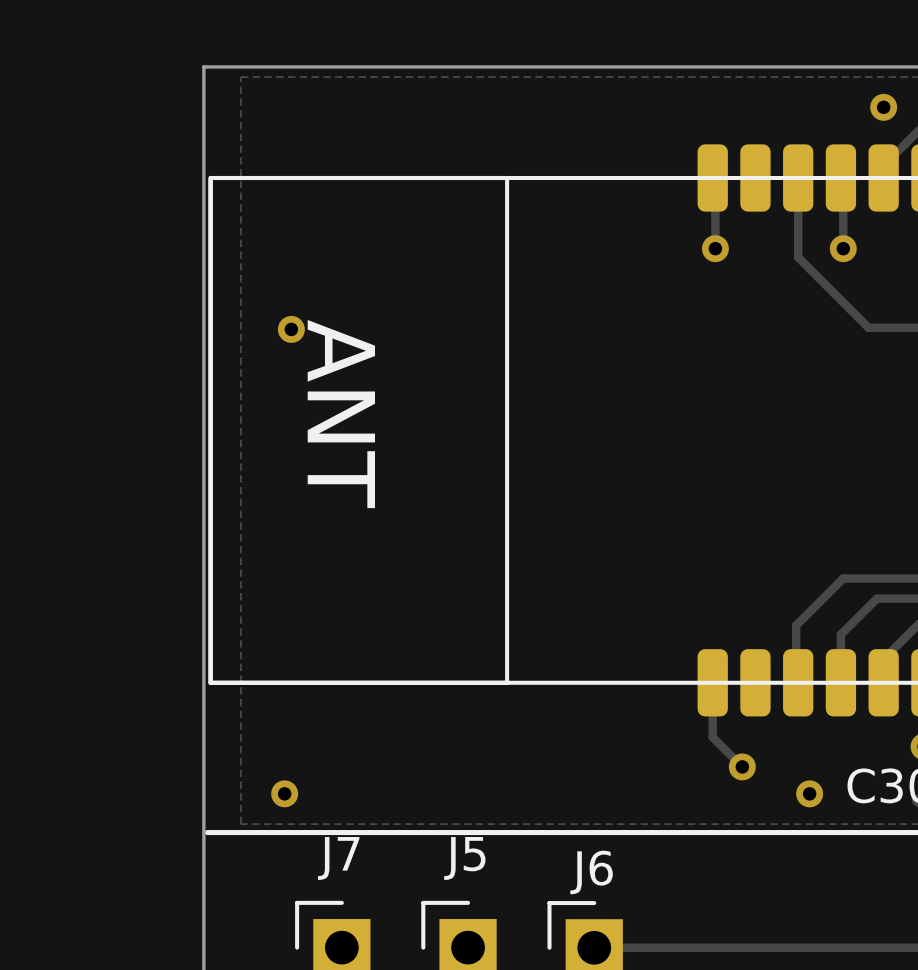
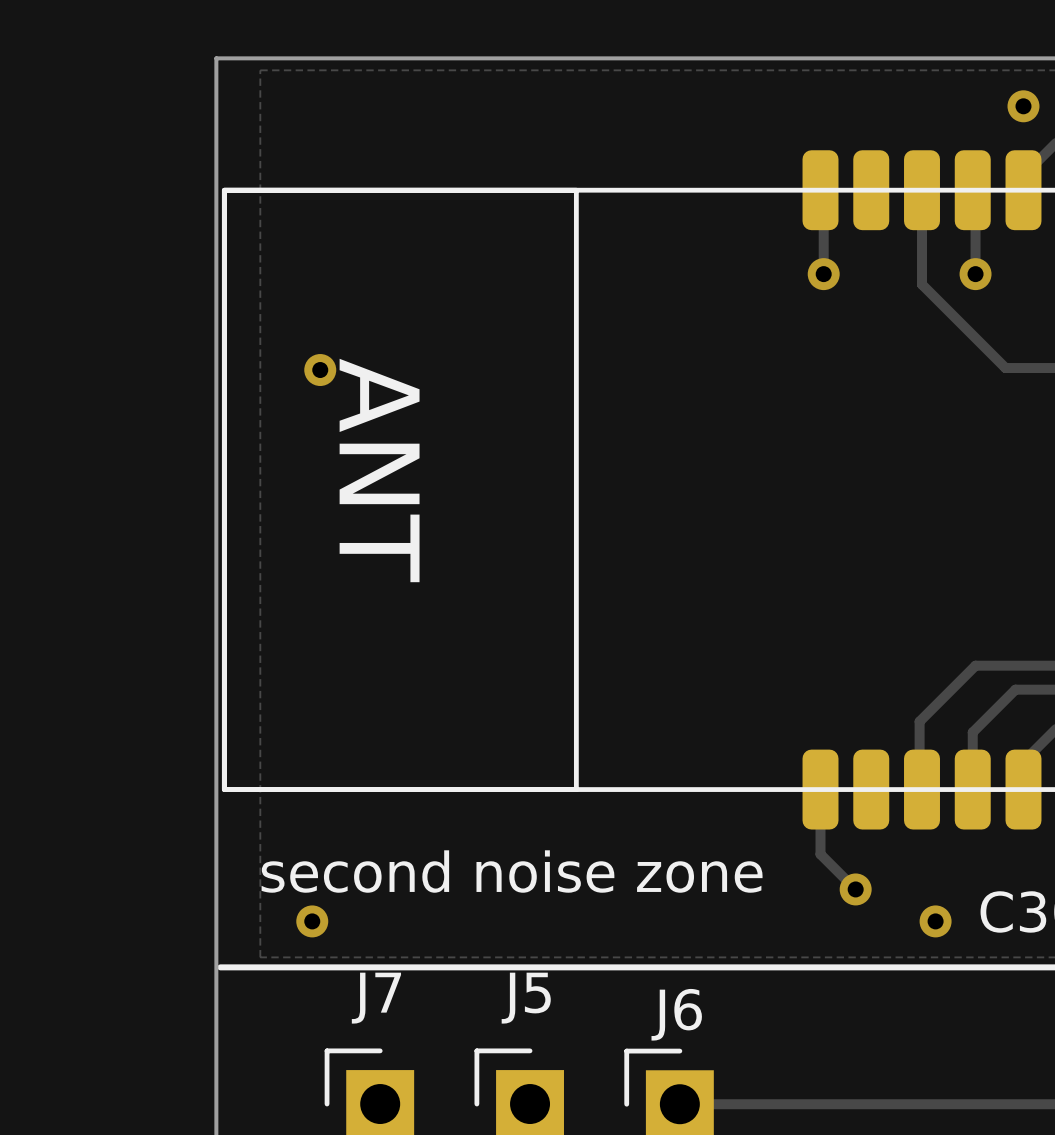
text: none -> second noise zone (512, 871)

